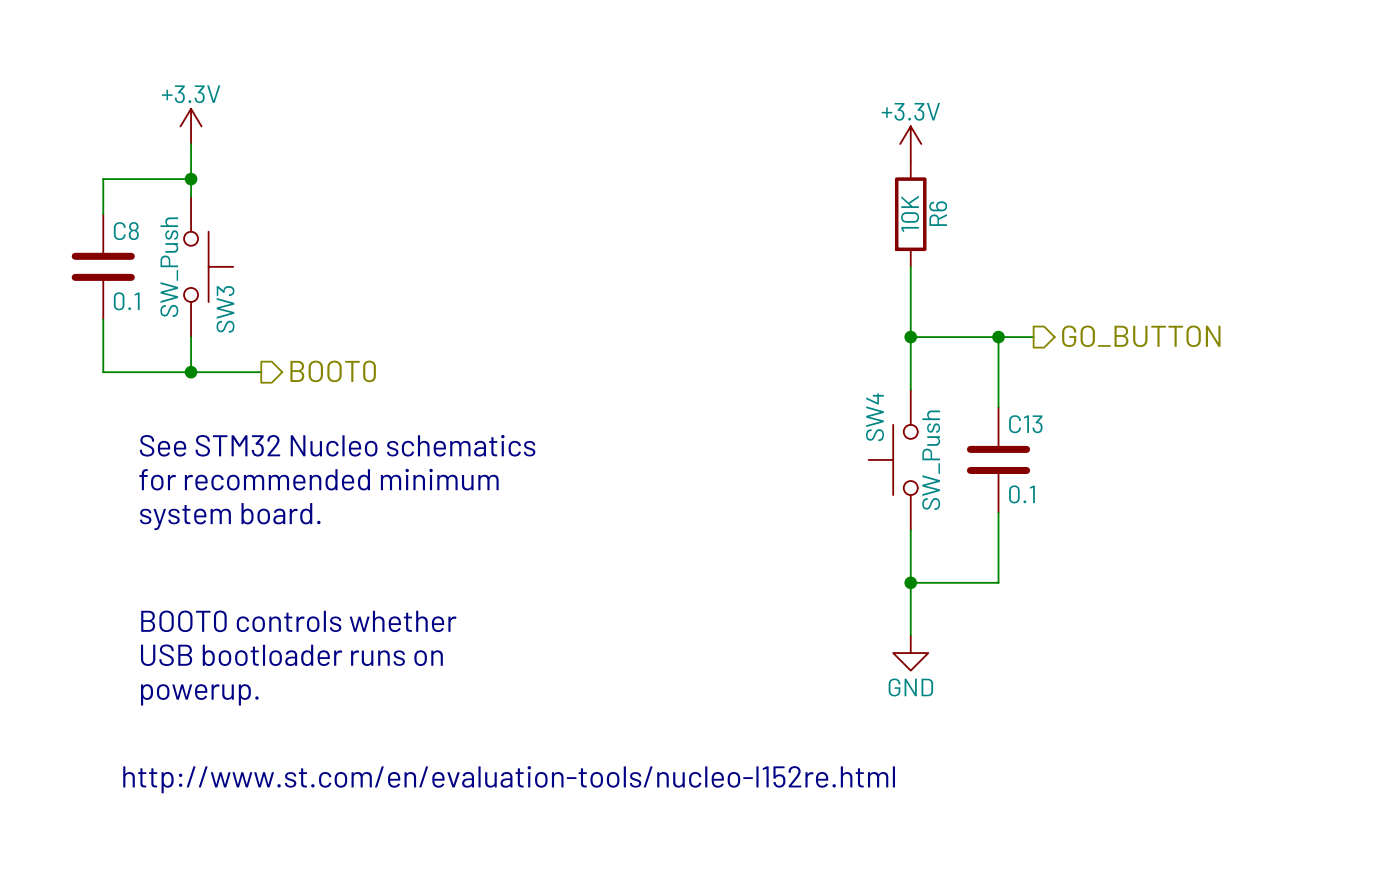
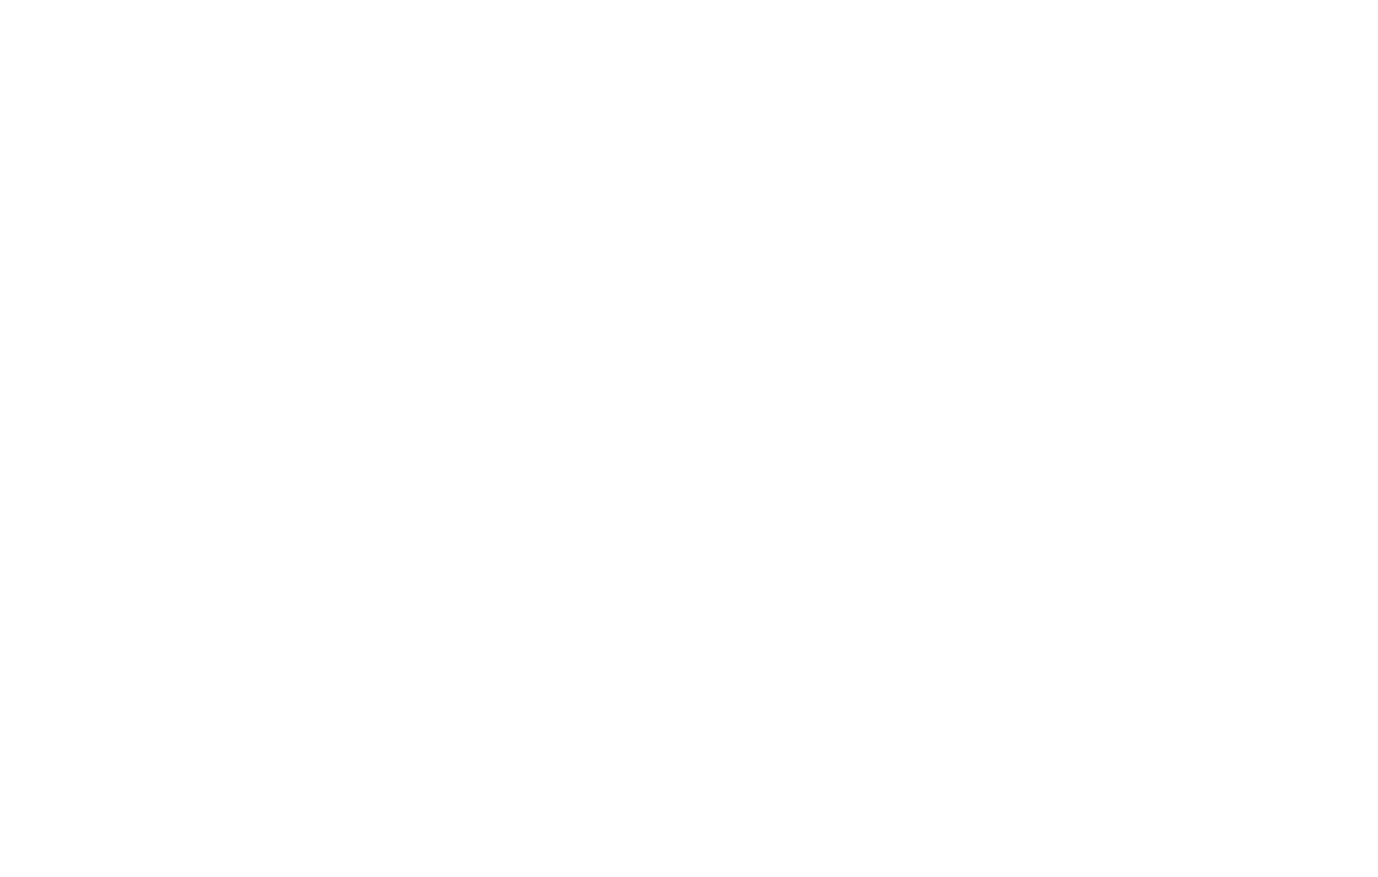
power symbol: +3.3V (191, 126) -> none
wire: (191, 143) (191, 196) -> none
power symbol: +3.3V (910, 143) -> none
wire: (191, 179) (103, 179) (103, 214) -> none
junction: (191, 179) -> none
R6: 10K (910, 214) -> none
C8: 0.1 (103, 266) -> none
SW3: SW_Push (208, 266) -> none
wire: (910, 266) (910, 389) -> none
wire: (103, 319) (103, 372) (261, 372) -> none
hierarchical label: GO_BUTTON (1141, 336) -> none
wire: (191, 337) (191, 372) -> none
wire: (910, 337) (1033, 337) -> none
junction: (910, 337) -> none
wire: (998, 337) (998, 407) -> none
junction: (998, 337) -> none
hierarchical label: BOOT0 (333, 371) -> none
junction: (191, 372) -> none
text: See STM32 Nucleo schematics (337, 445) -> none
SW4: SW_Push (893, 459) -> none
C13: 0.1 (998, 459) -> none
text: for recommended minimum (319, 479) -> none
wire: (998, 512) (998, 582) (910, 582) -> none
text: system board. (230, 516) -> none
wire: (910, 530) (910, 635) -> none
junction: (910, 582) -> none
text: BOOT0 controls whether (298, 621) -> none
power symbol: GND (910, 653) -> none
text: USB bootloader runs on (291, 655) -> none
text: powerup. (199, 694) -> none
text: http://www.st.com/en/evaluation-tools/nucleo-l152re.html (509, 779) -> none

